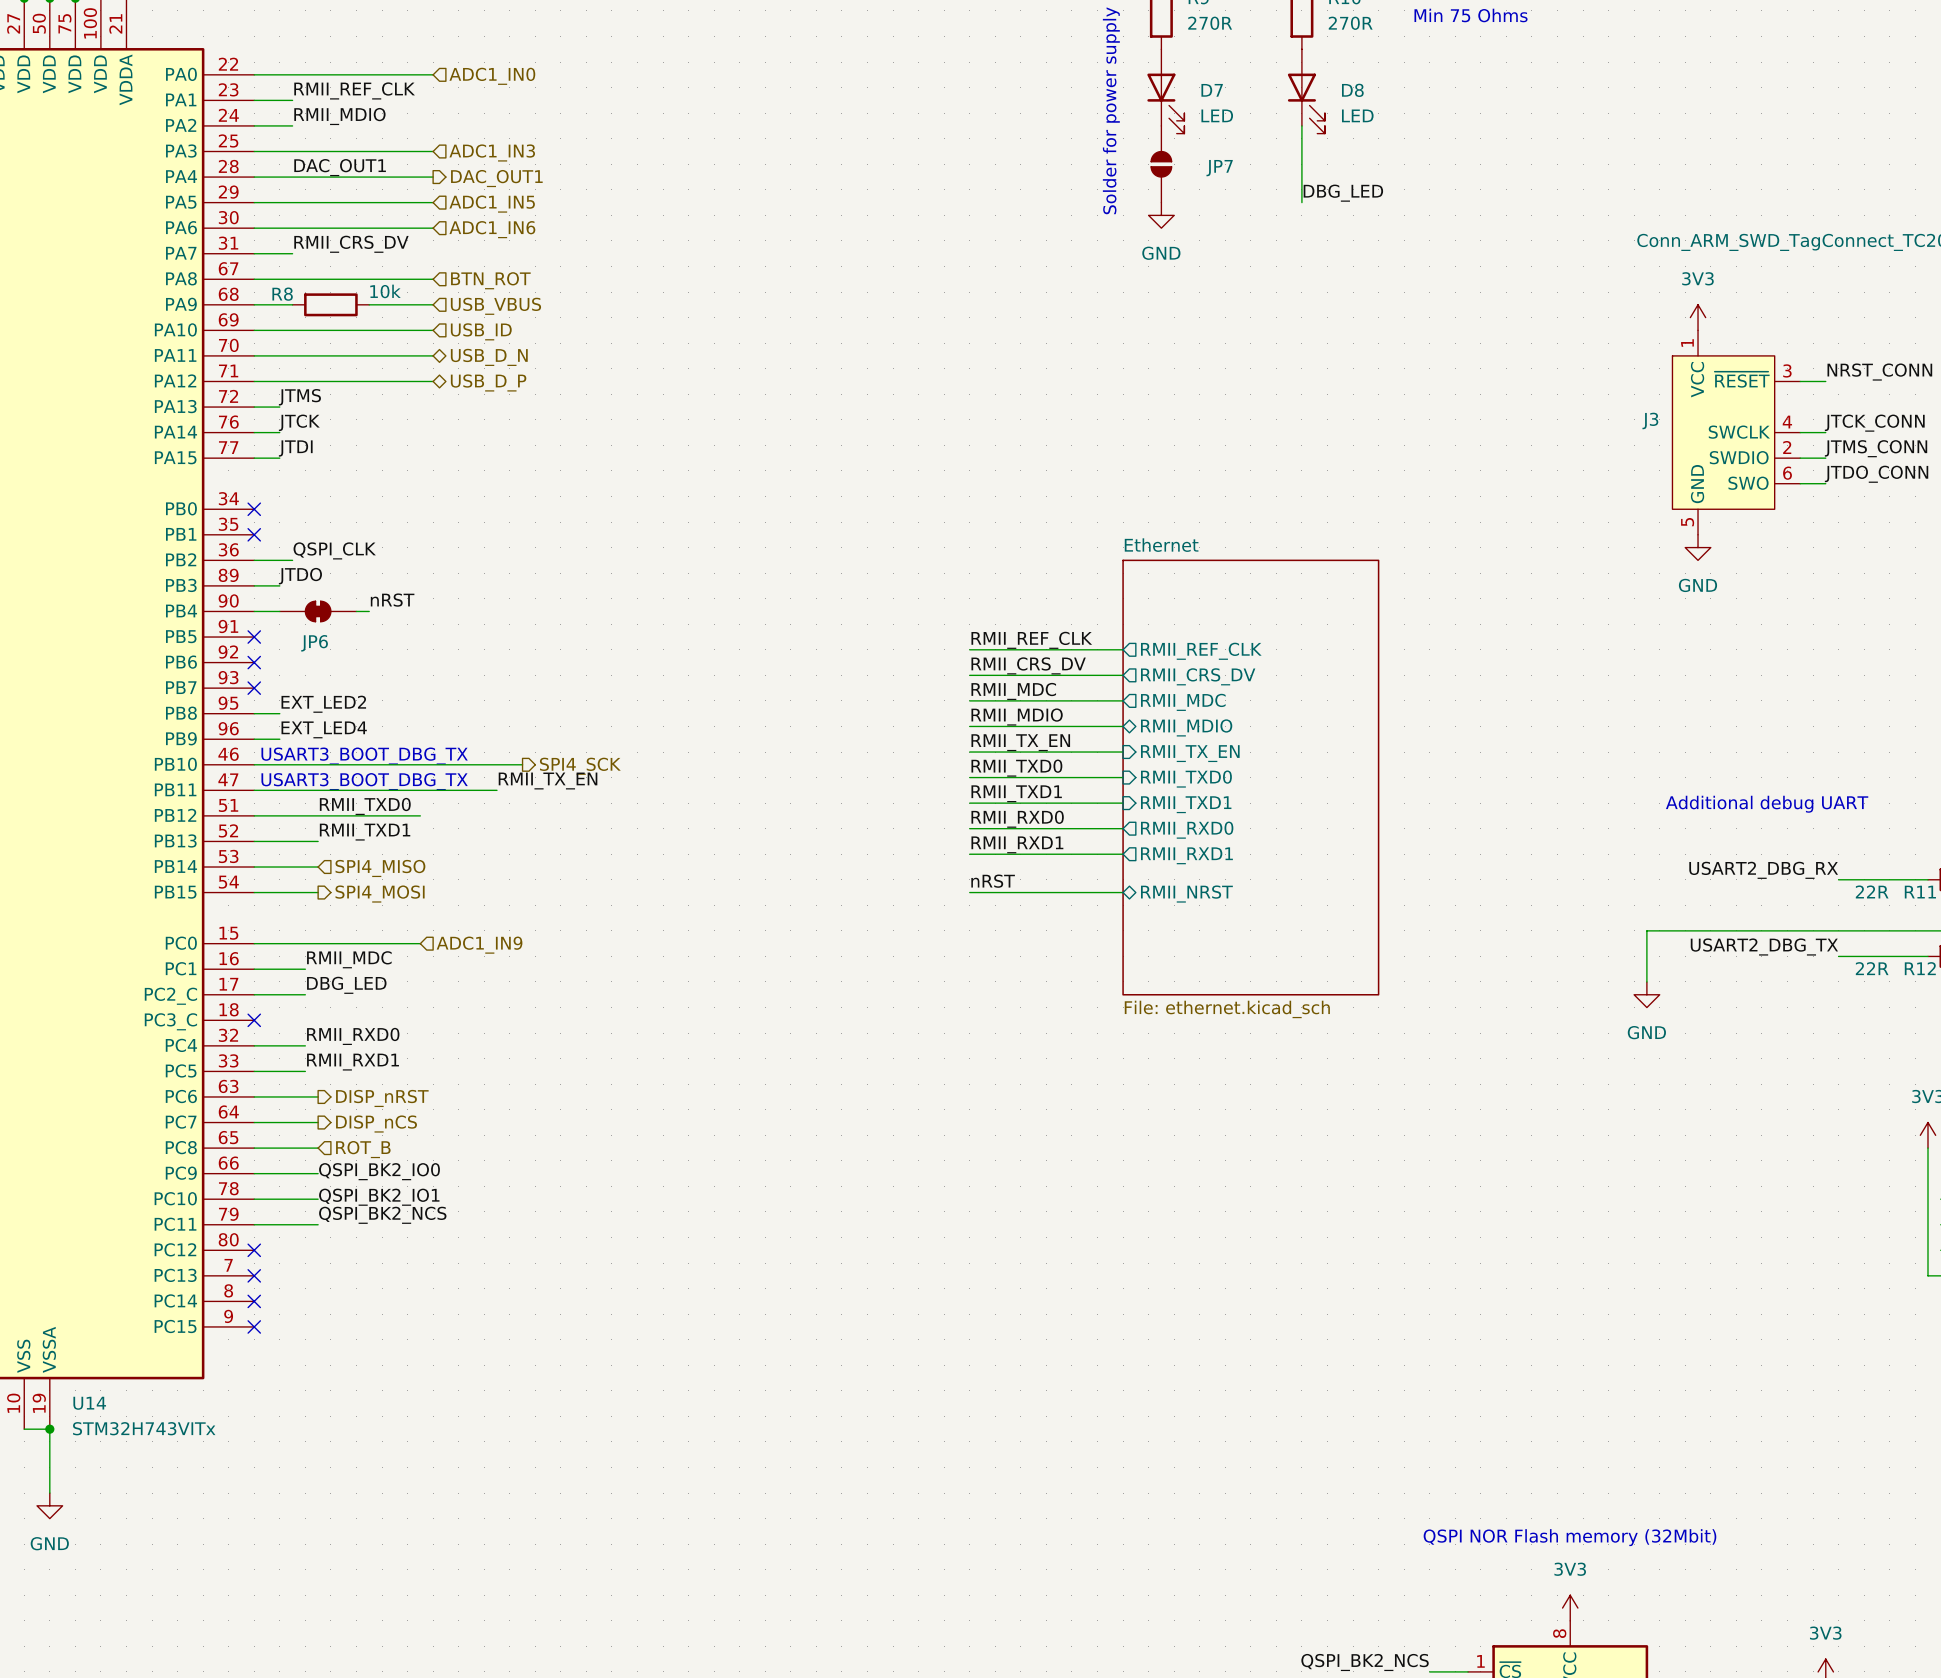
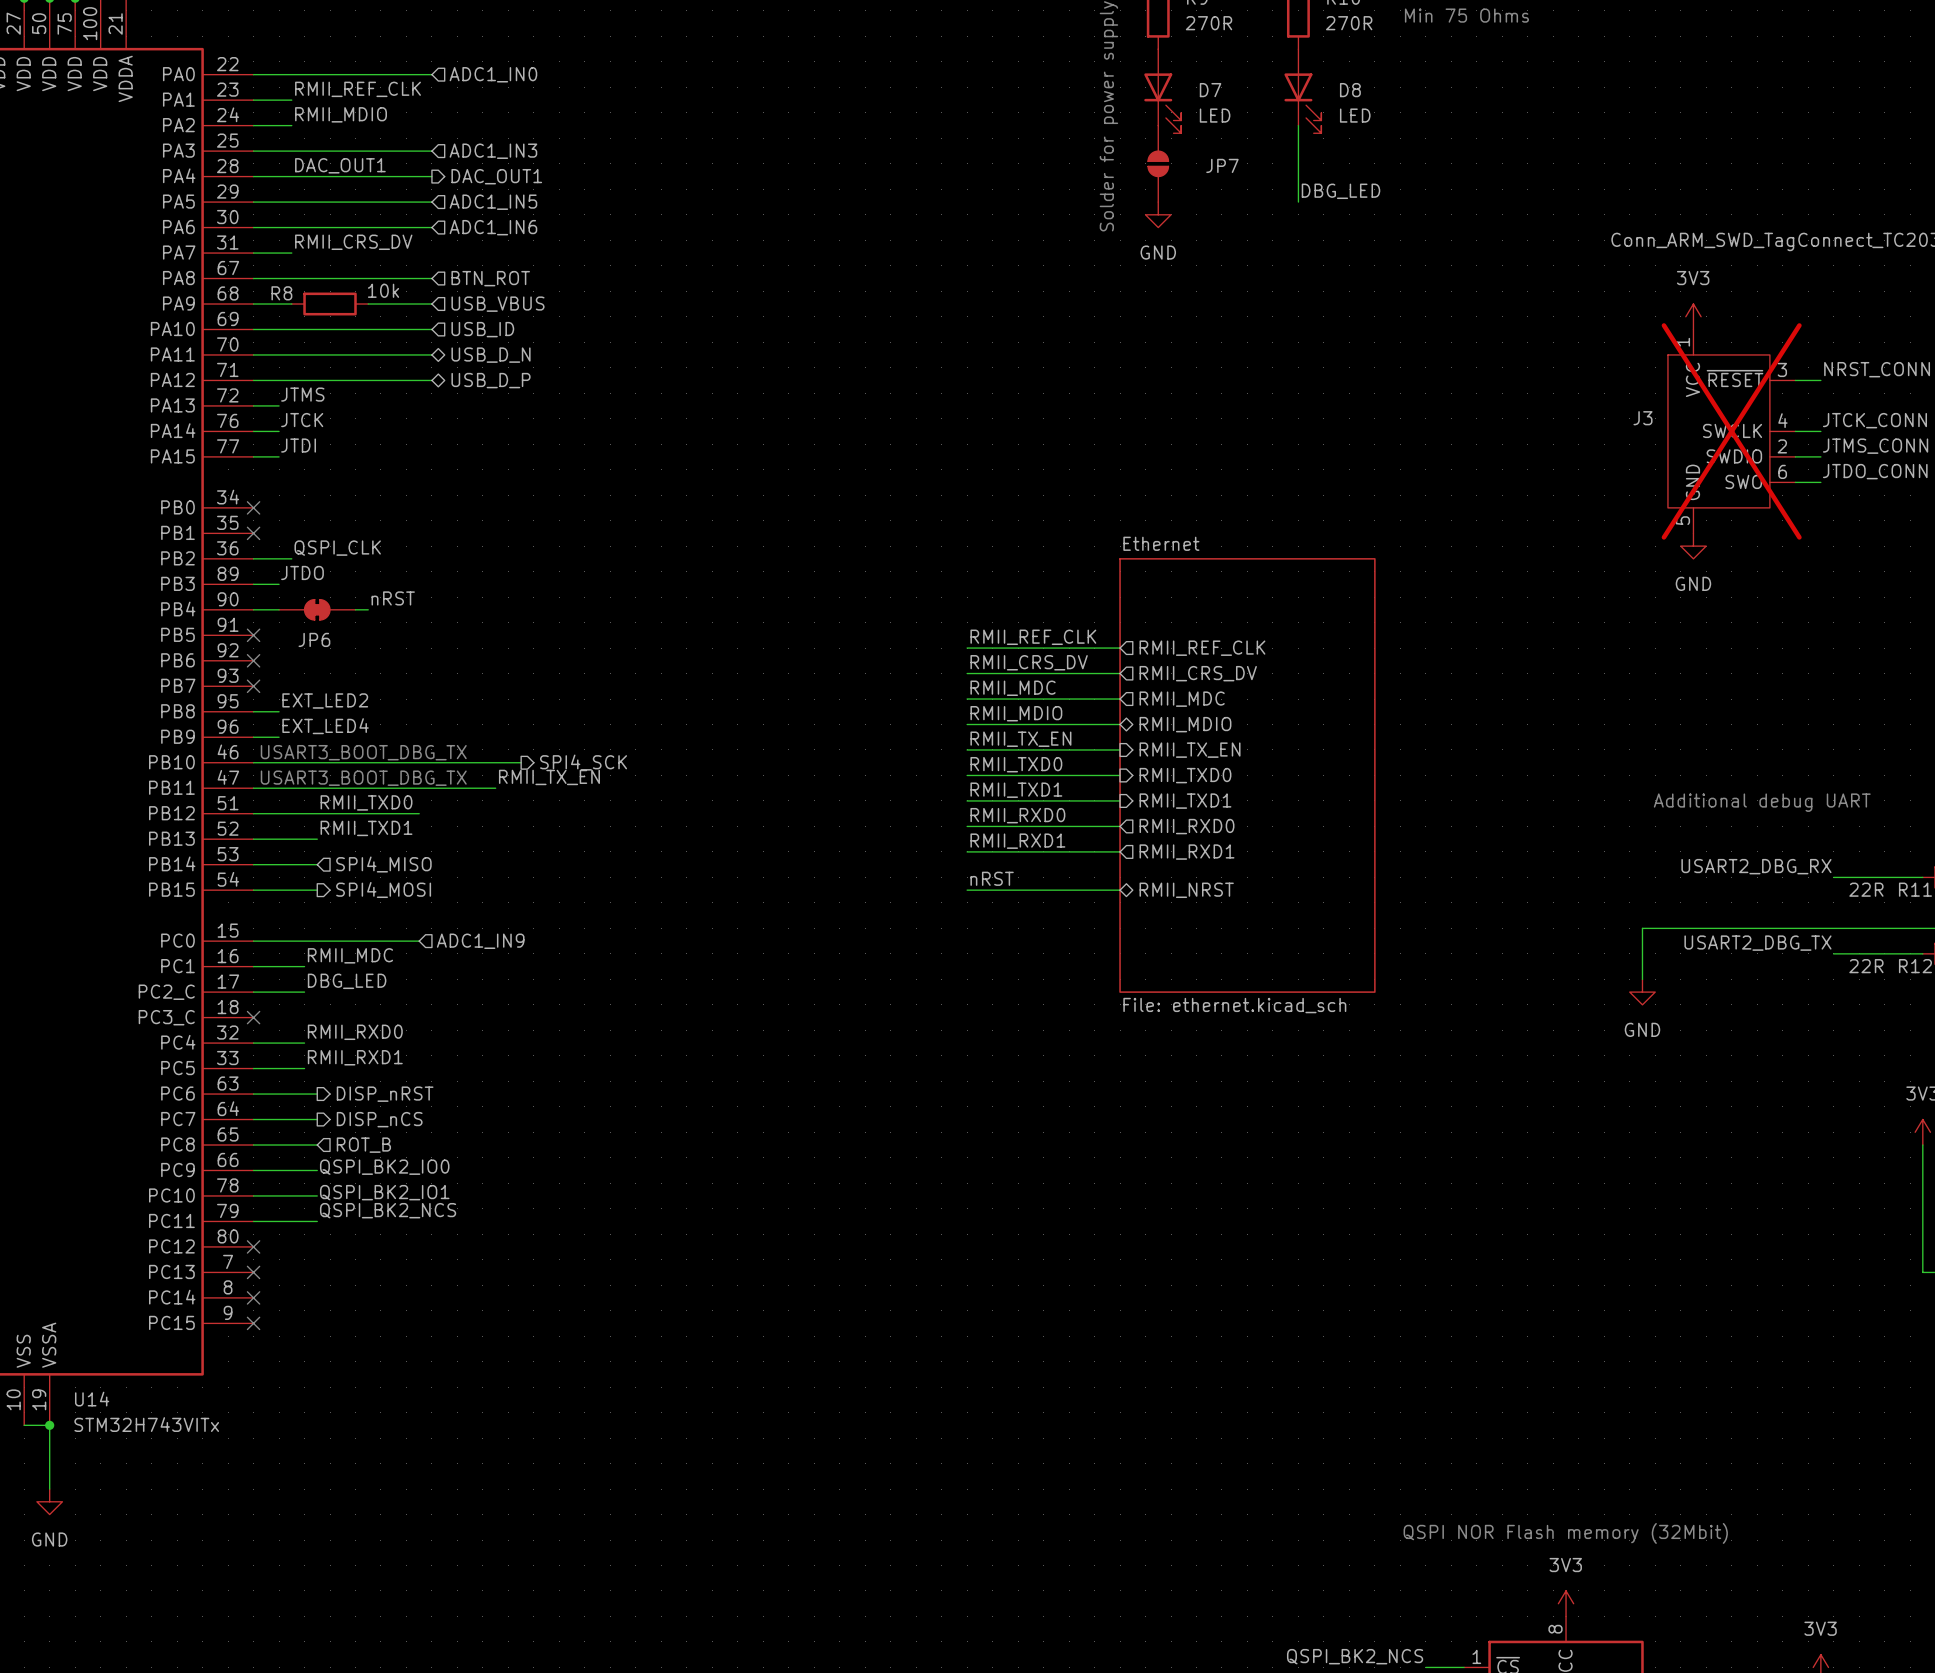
J3 do-not-place cross: none -> (1731, 431)

